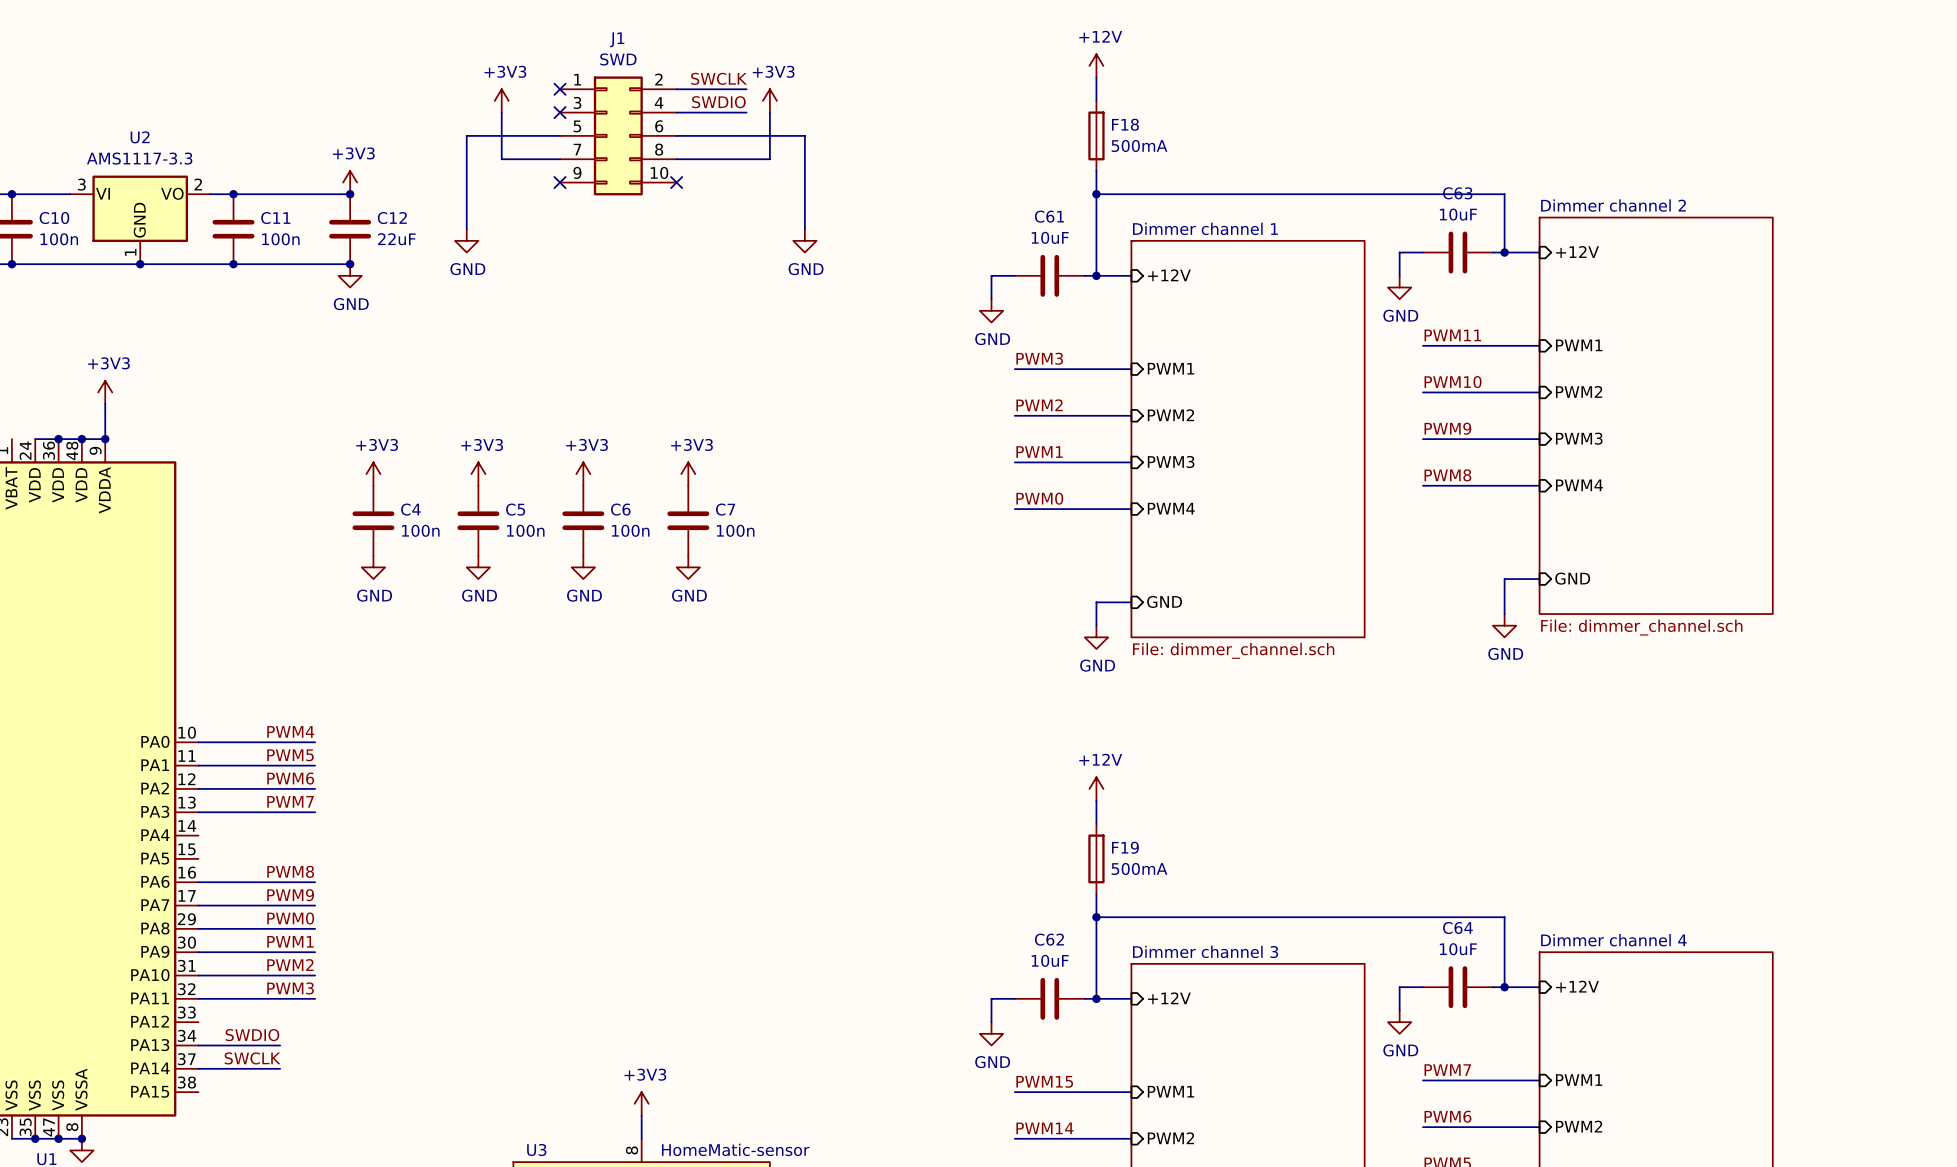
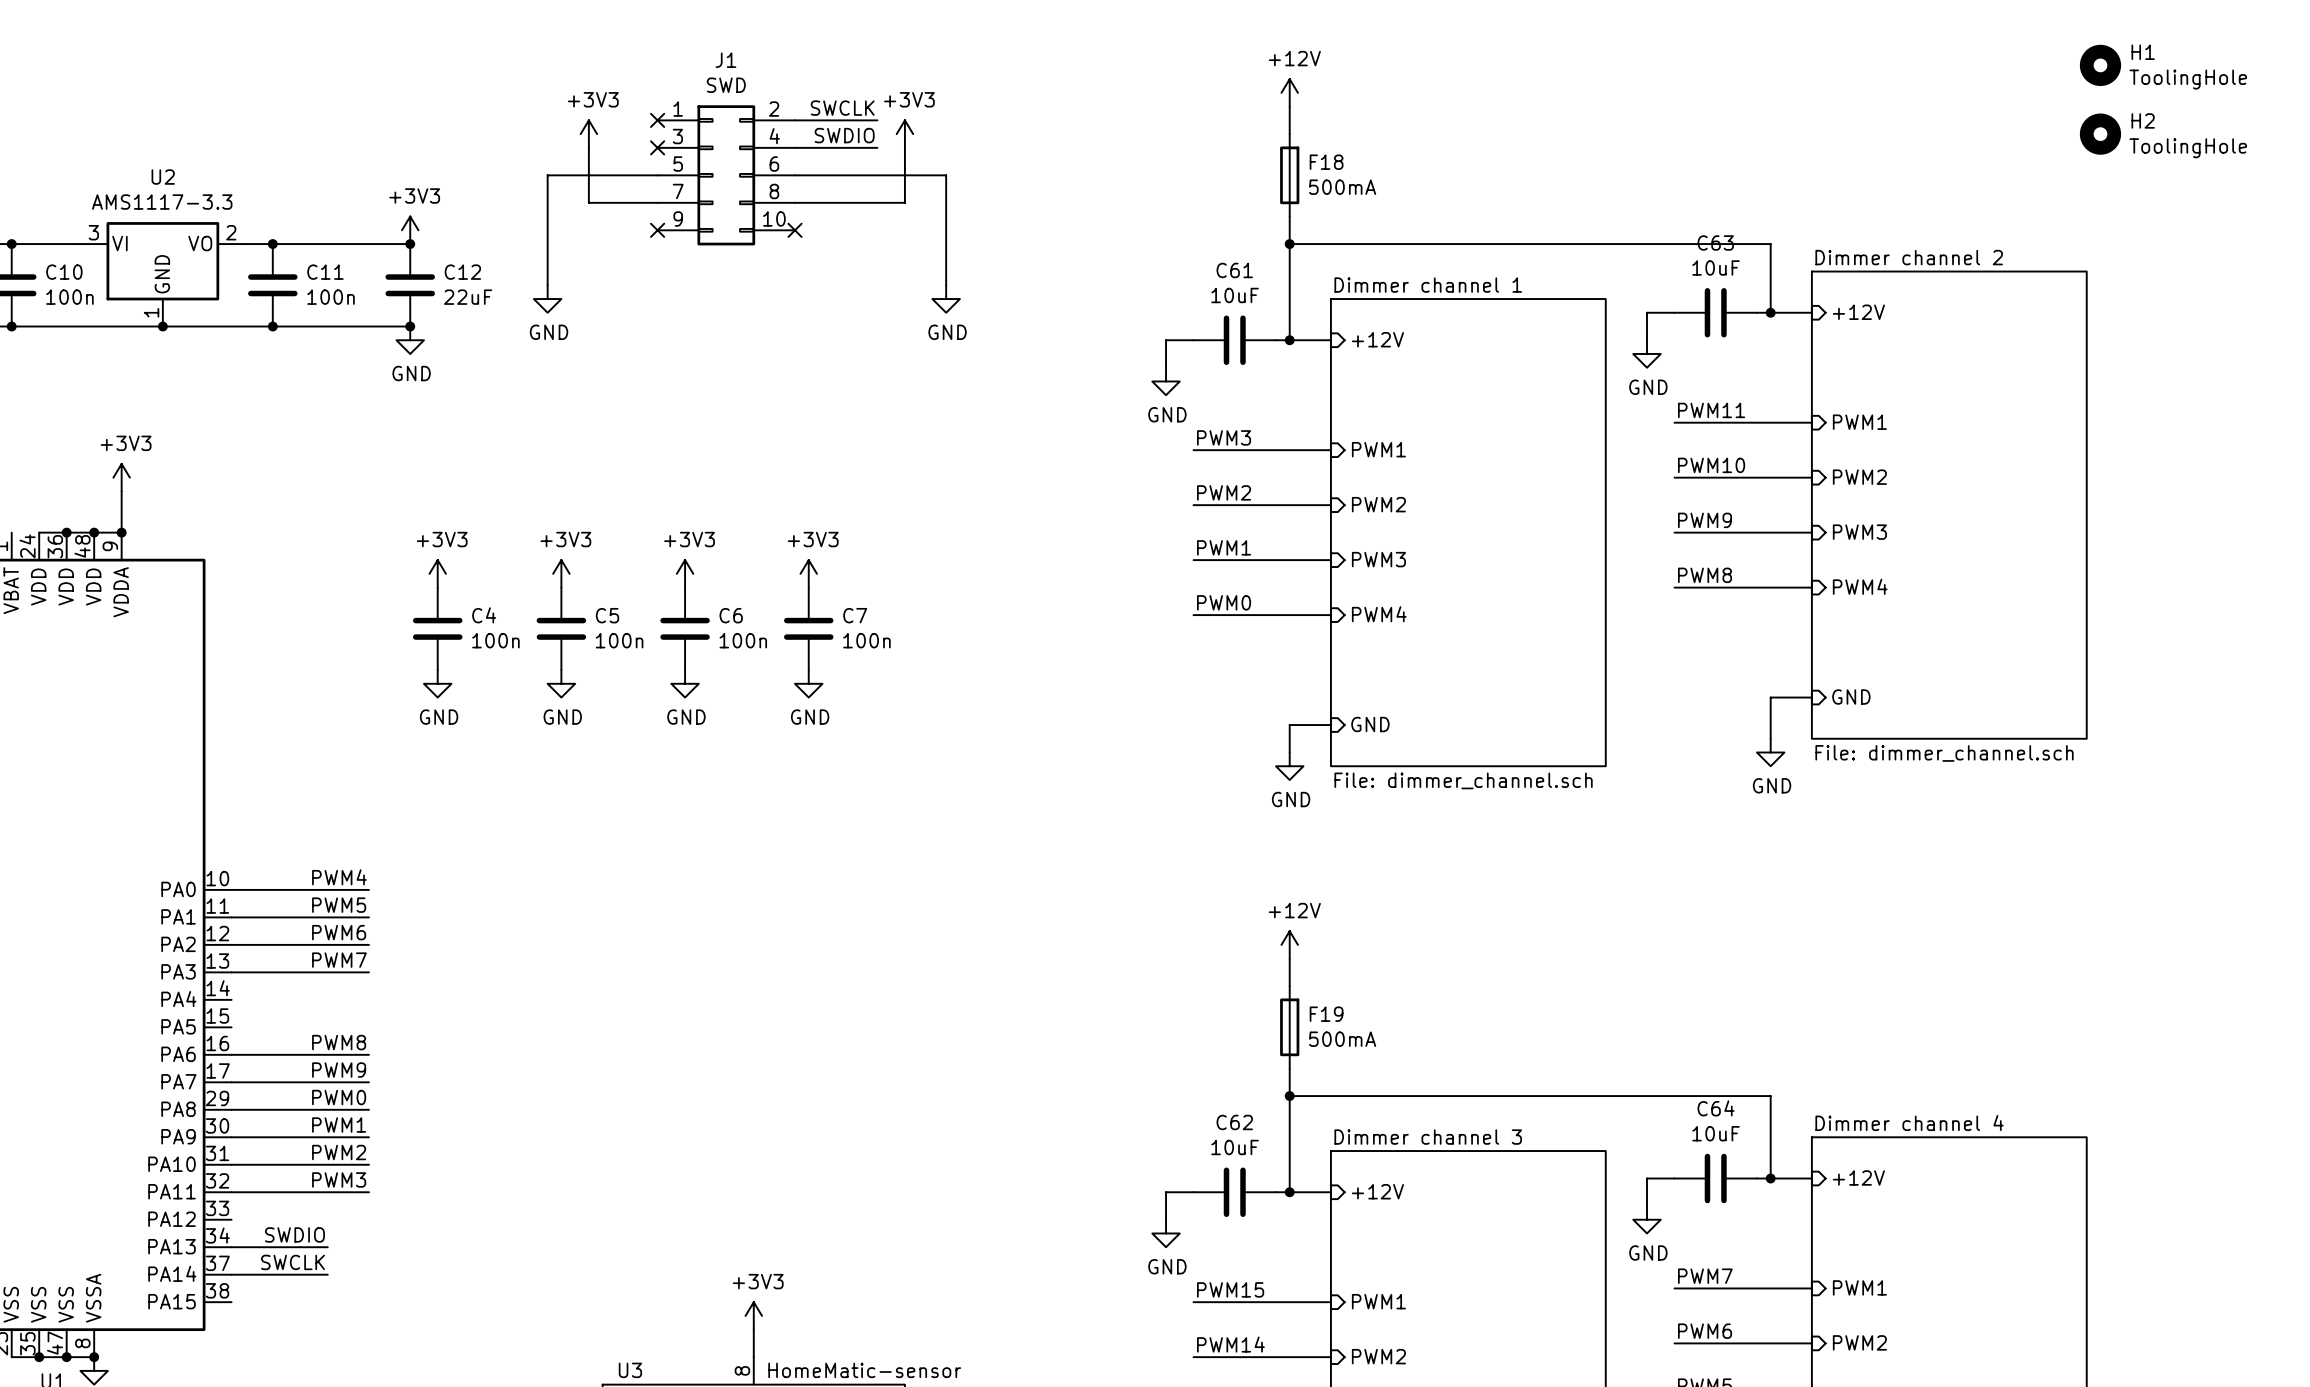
H1: none -> ToolingHole (2100, 65)
H2: none -> ToolingHole (2100, 134)

